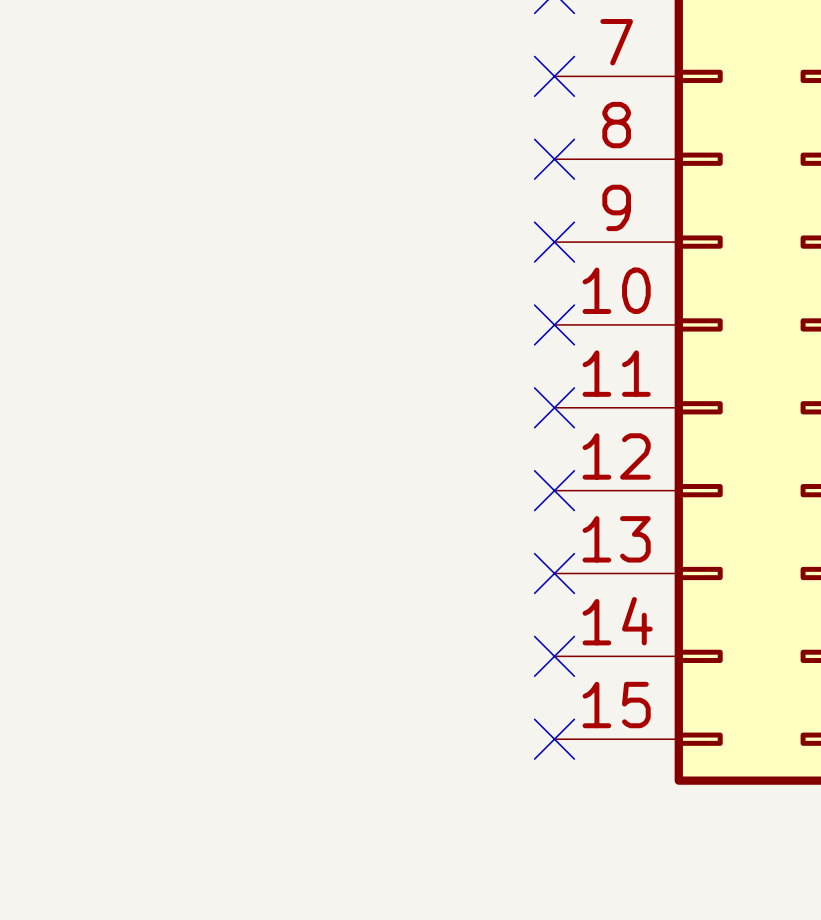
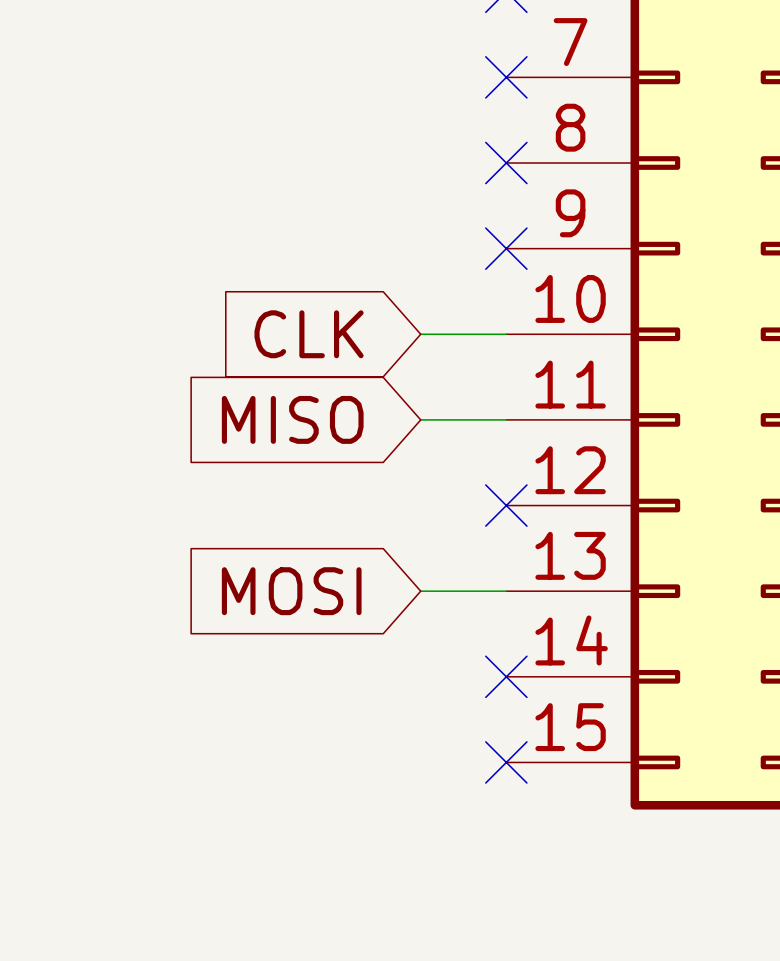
global label: none -> CLK (309, 334)
wire: none -> (420, 334) (506, 334)
no-connect mark: (554, 324) -> none
global label: none -> MISO (292, 419)
wire: none -> (420, 419) (506, 419)
no-connect mark: (554, 407) -> none
global label: none -> MOSI (291, 591)
wire: none -> (420, 591) (506, 591)
no-connect mark: (554, 573) -> none

